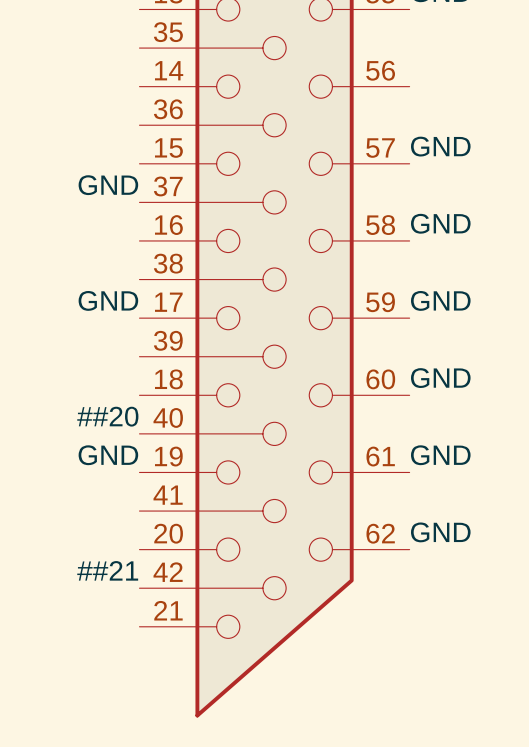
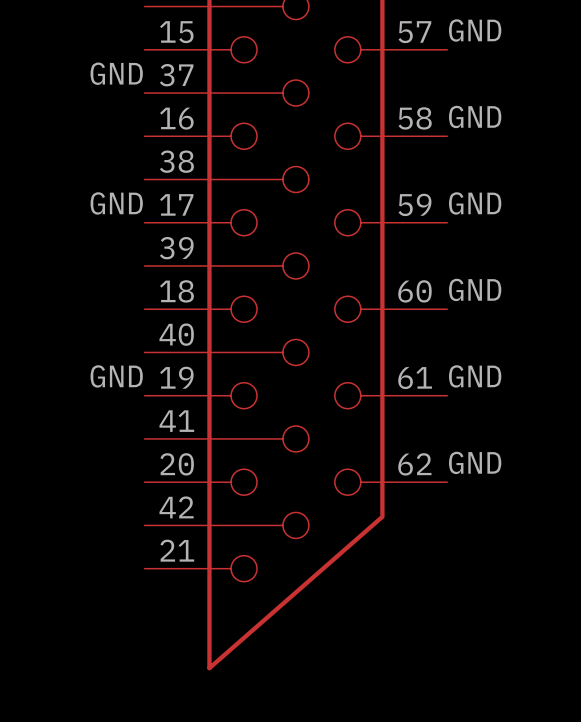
label: ##20 (107, 416) -> none
label: ##21 (107, 570) -> none

